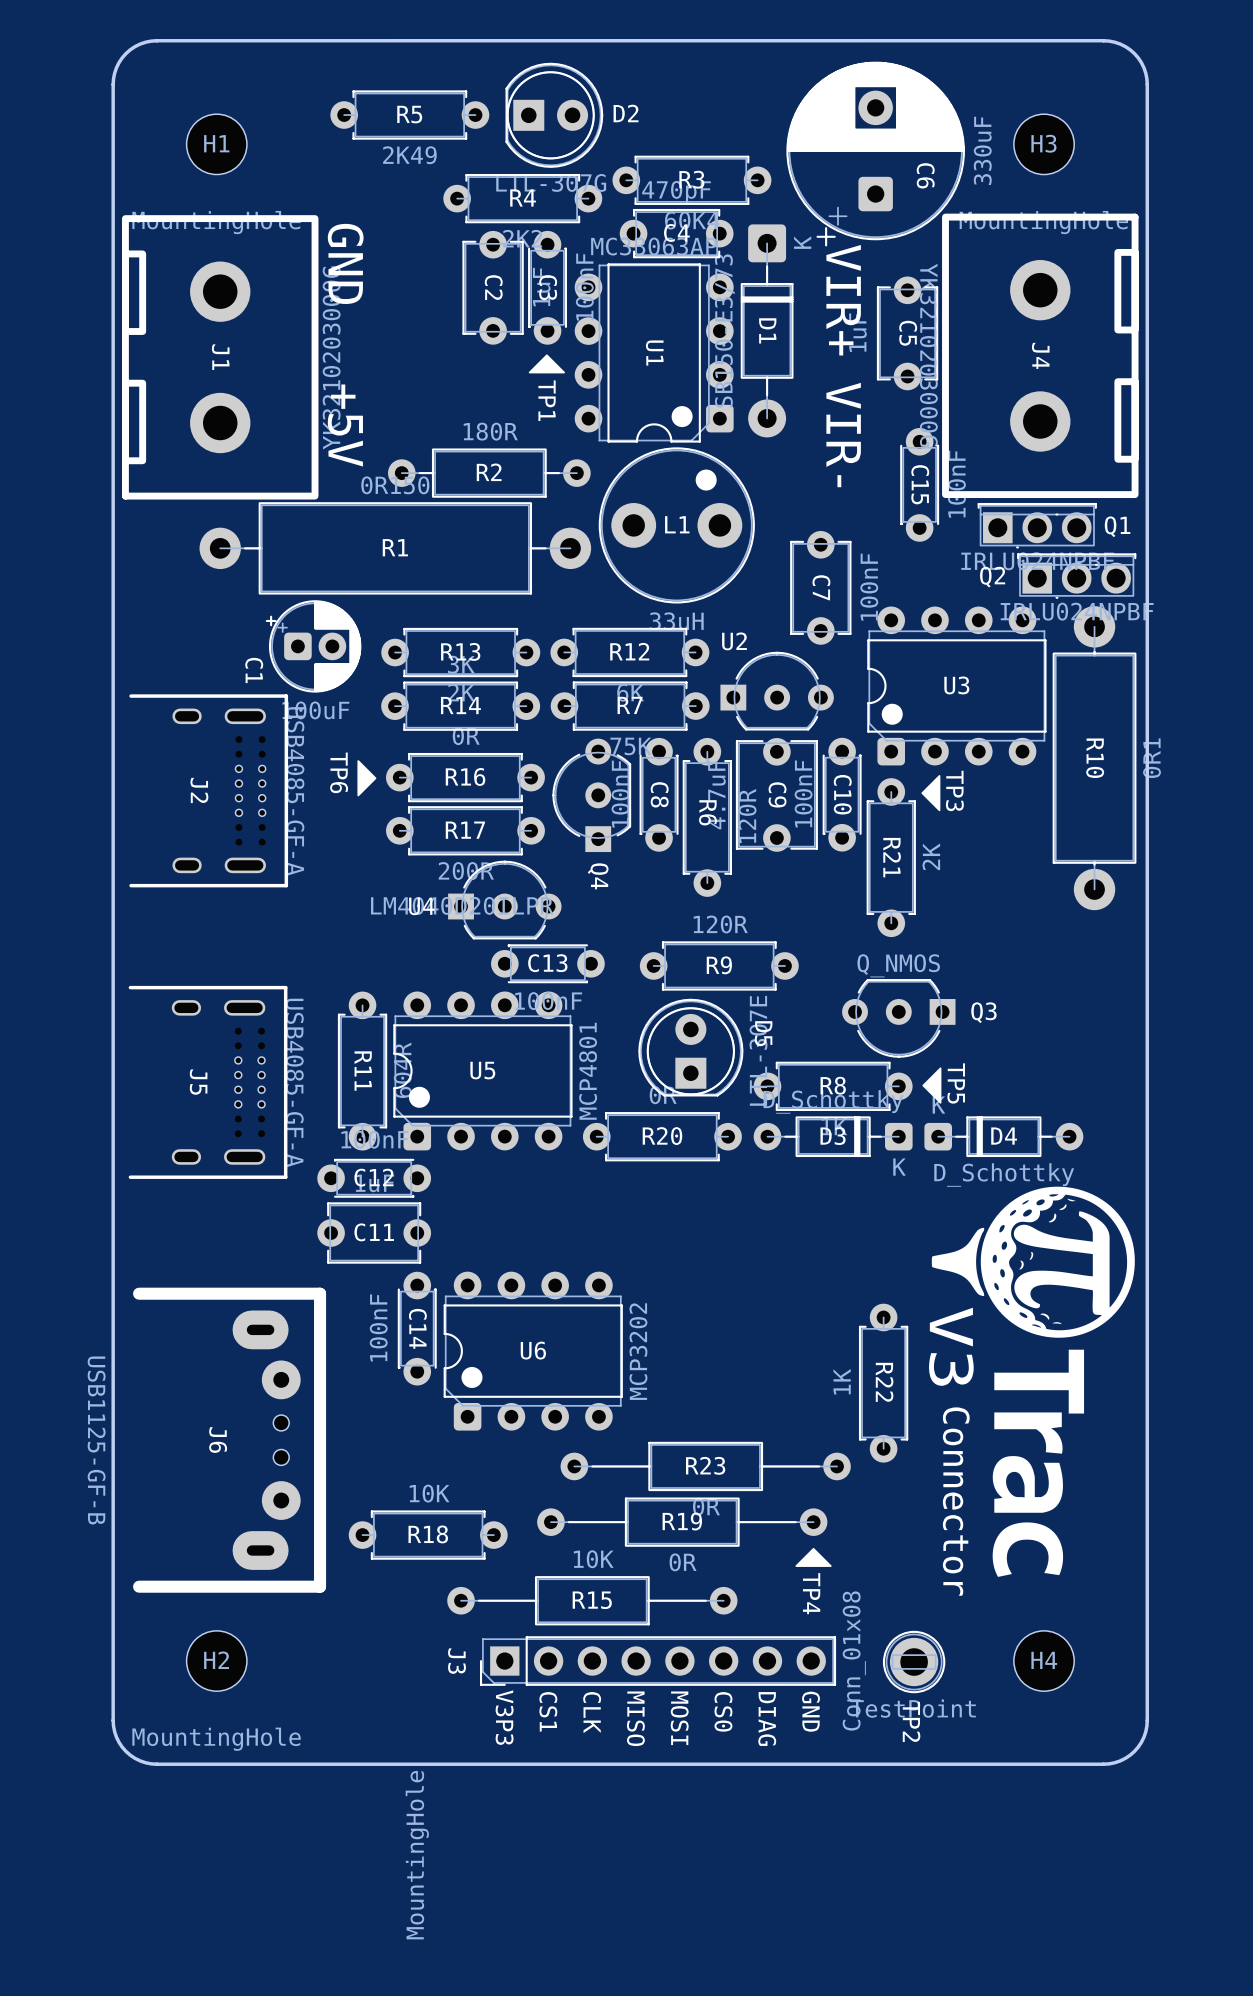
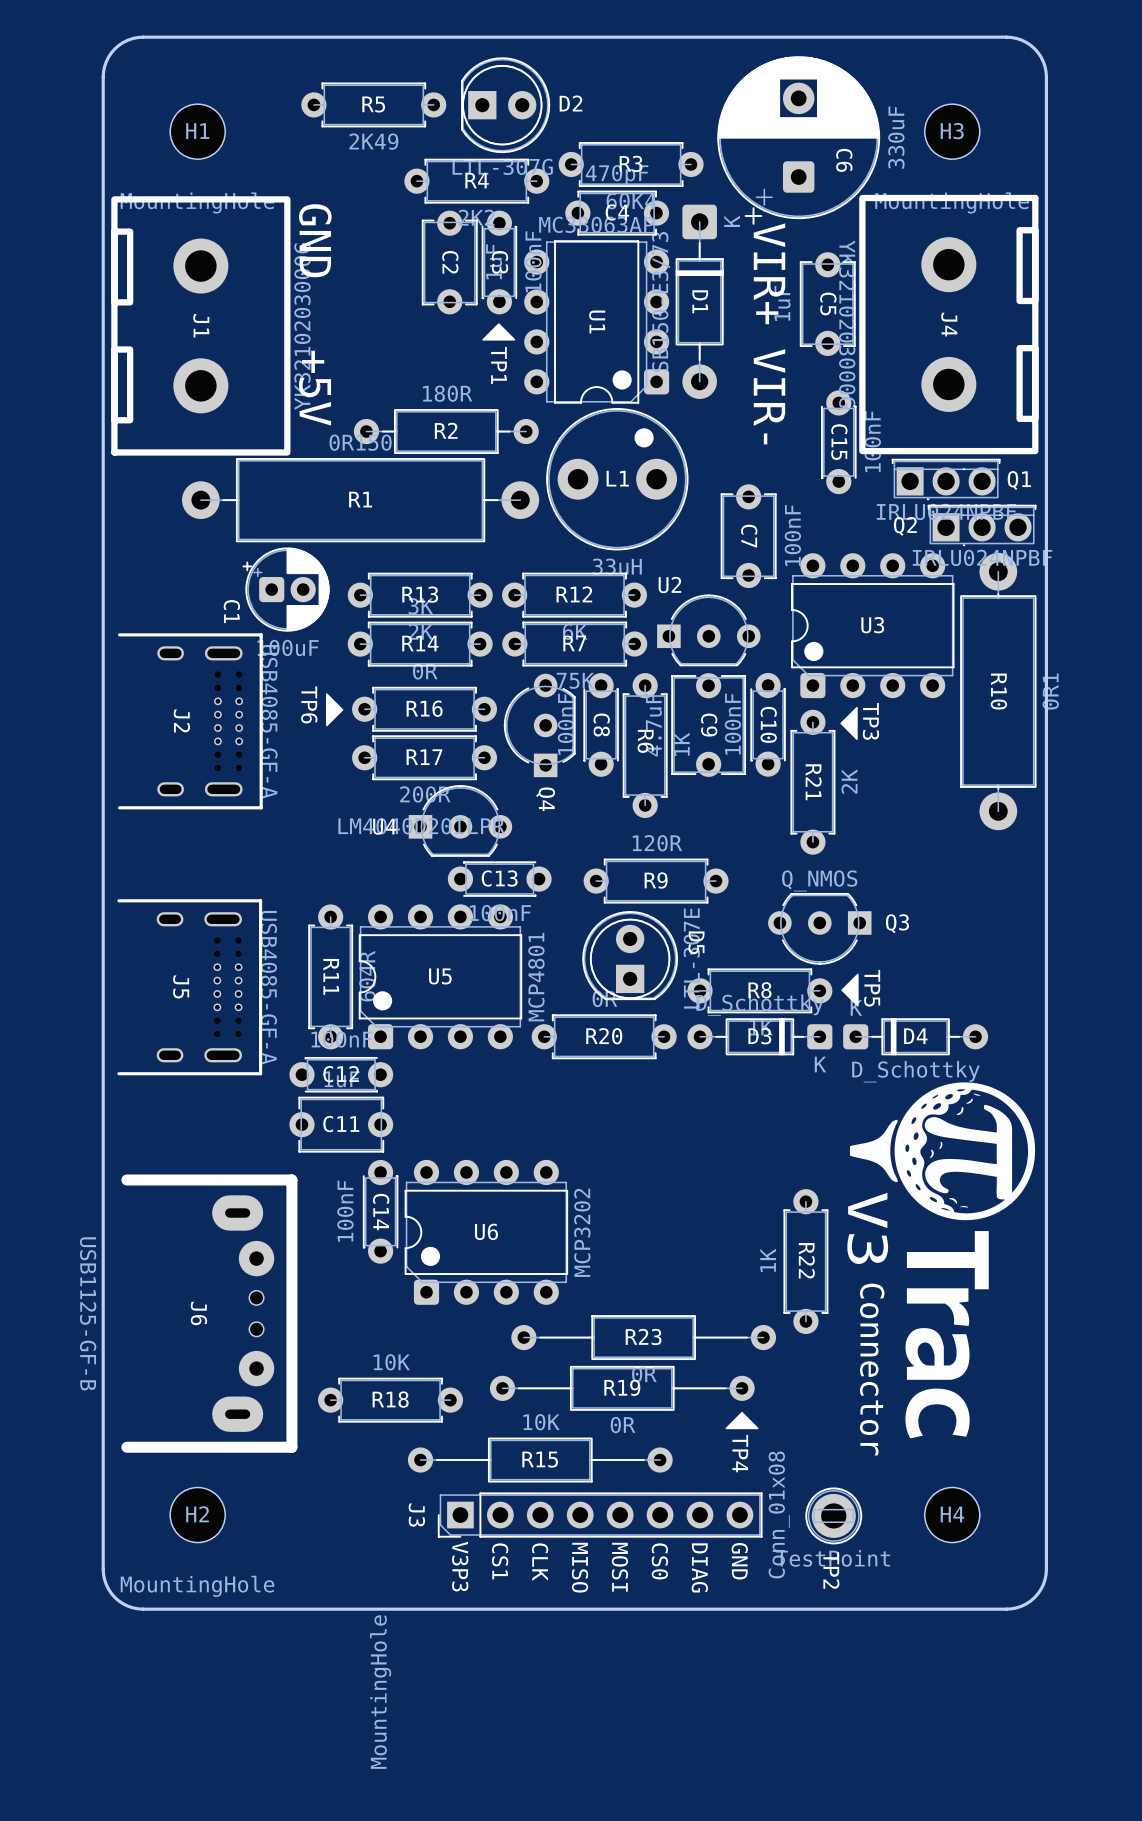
R6 value: 120R (747, 815) -> 1K (681, 744)

